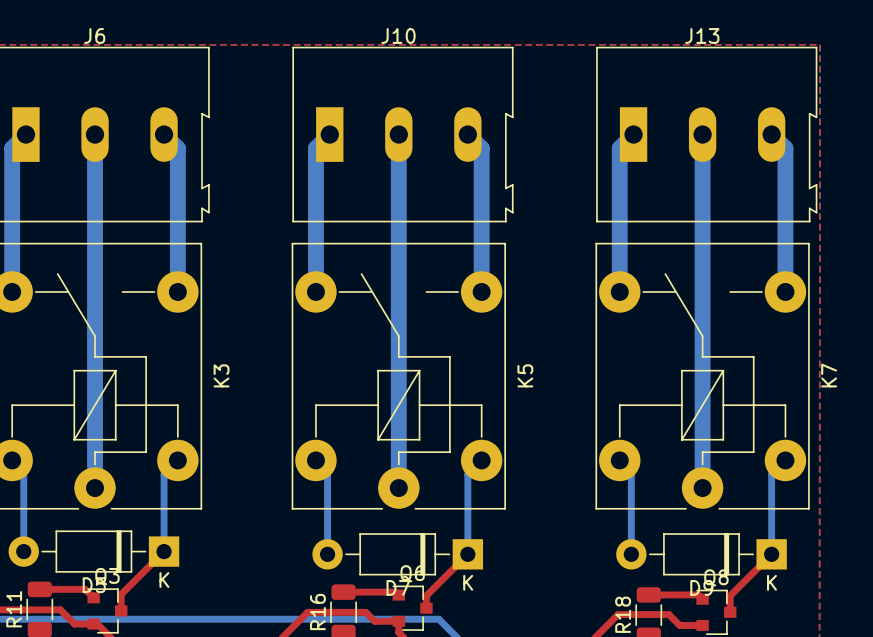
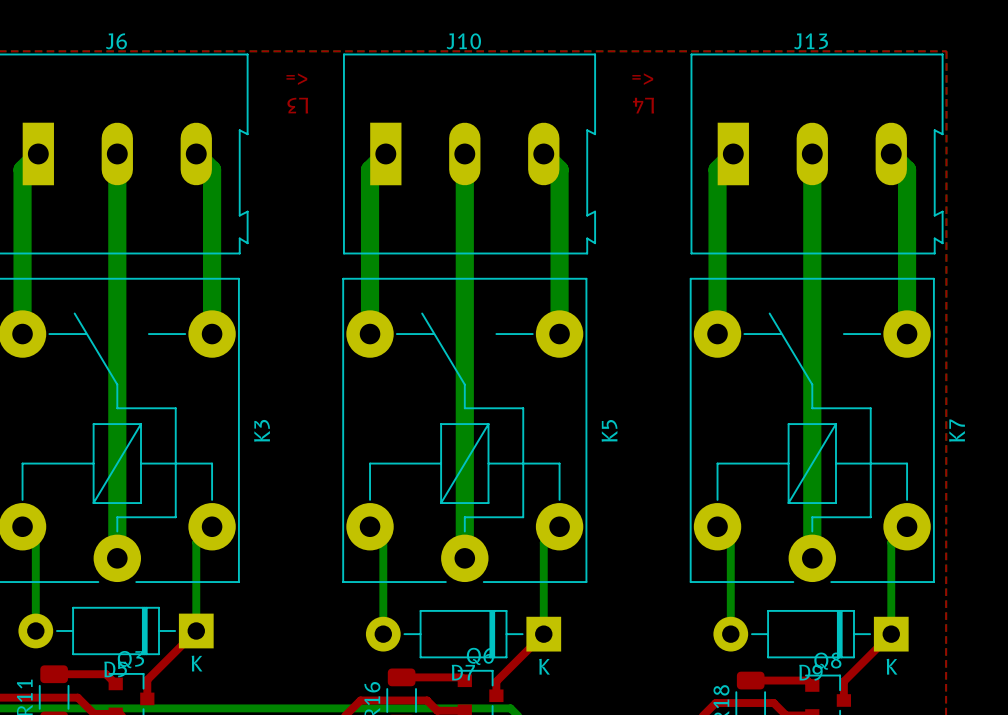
text: none -> <= (296, 79)
text: none -> <= (642, 79)
text: none -> L3 (297, 105)
text: none -> L4 (643, 105)

